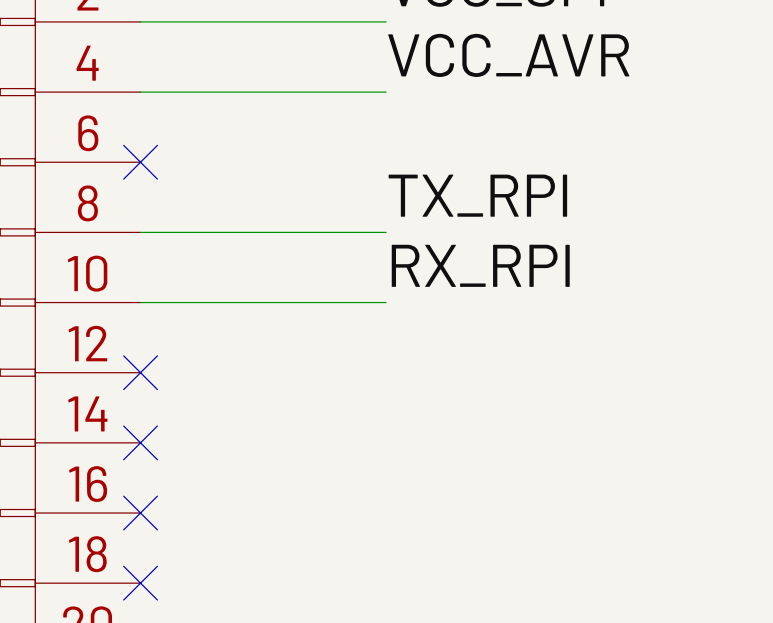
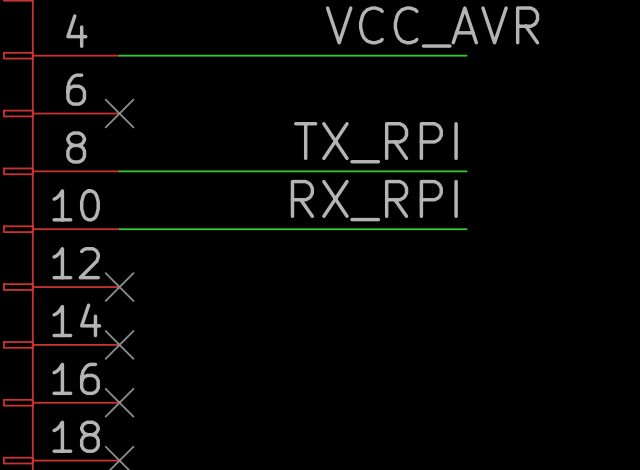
wire: none -> (322, 55) (466, 55)
label position: TX_RPI (477, 195) -> TX_RPI (375, 142)
wire: none -> (322, 171) (466, 171)
label position: RX_RPI (480, 265) -> RX_RPI (374, 200)
wire: none -> (322, 229) (466, 229)

